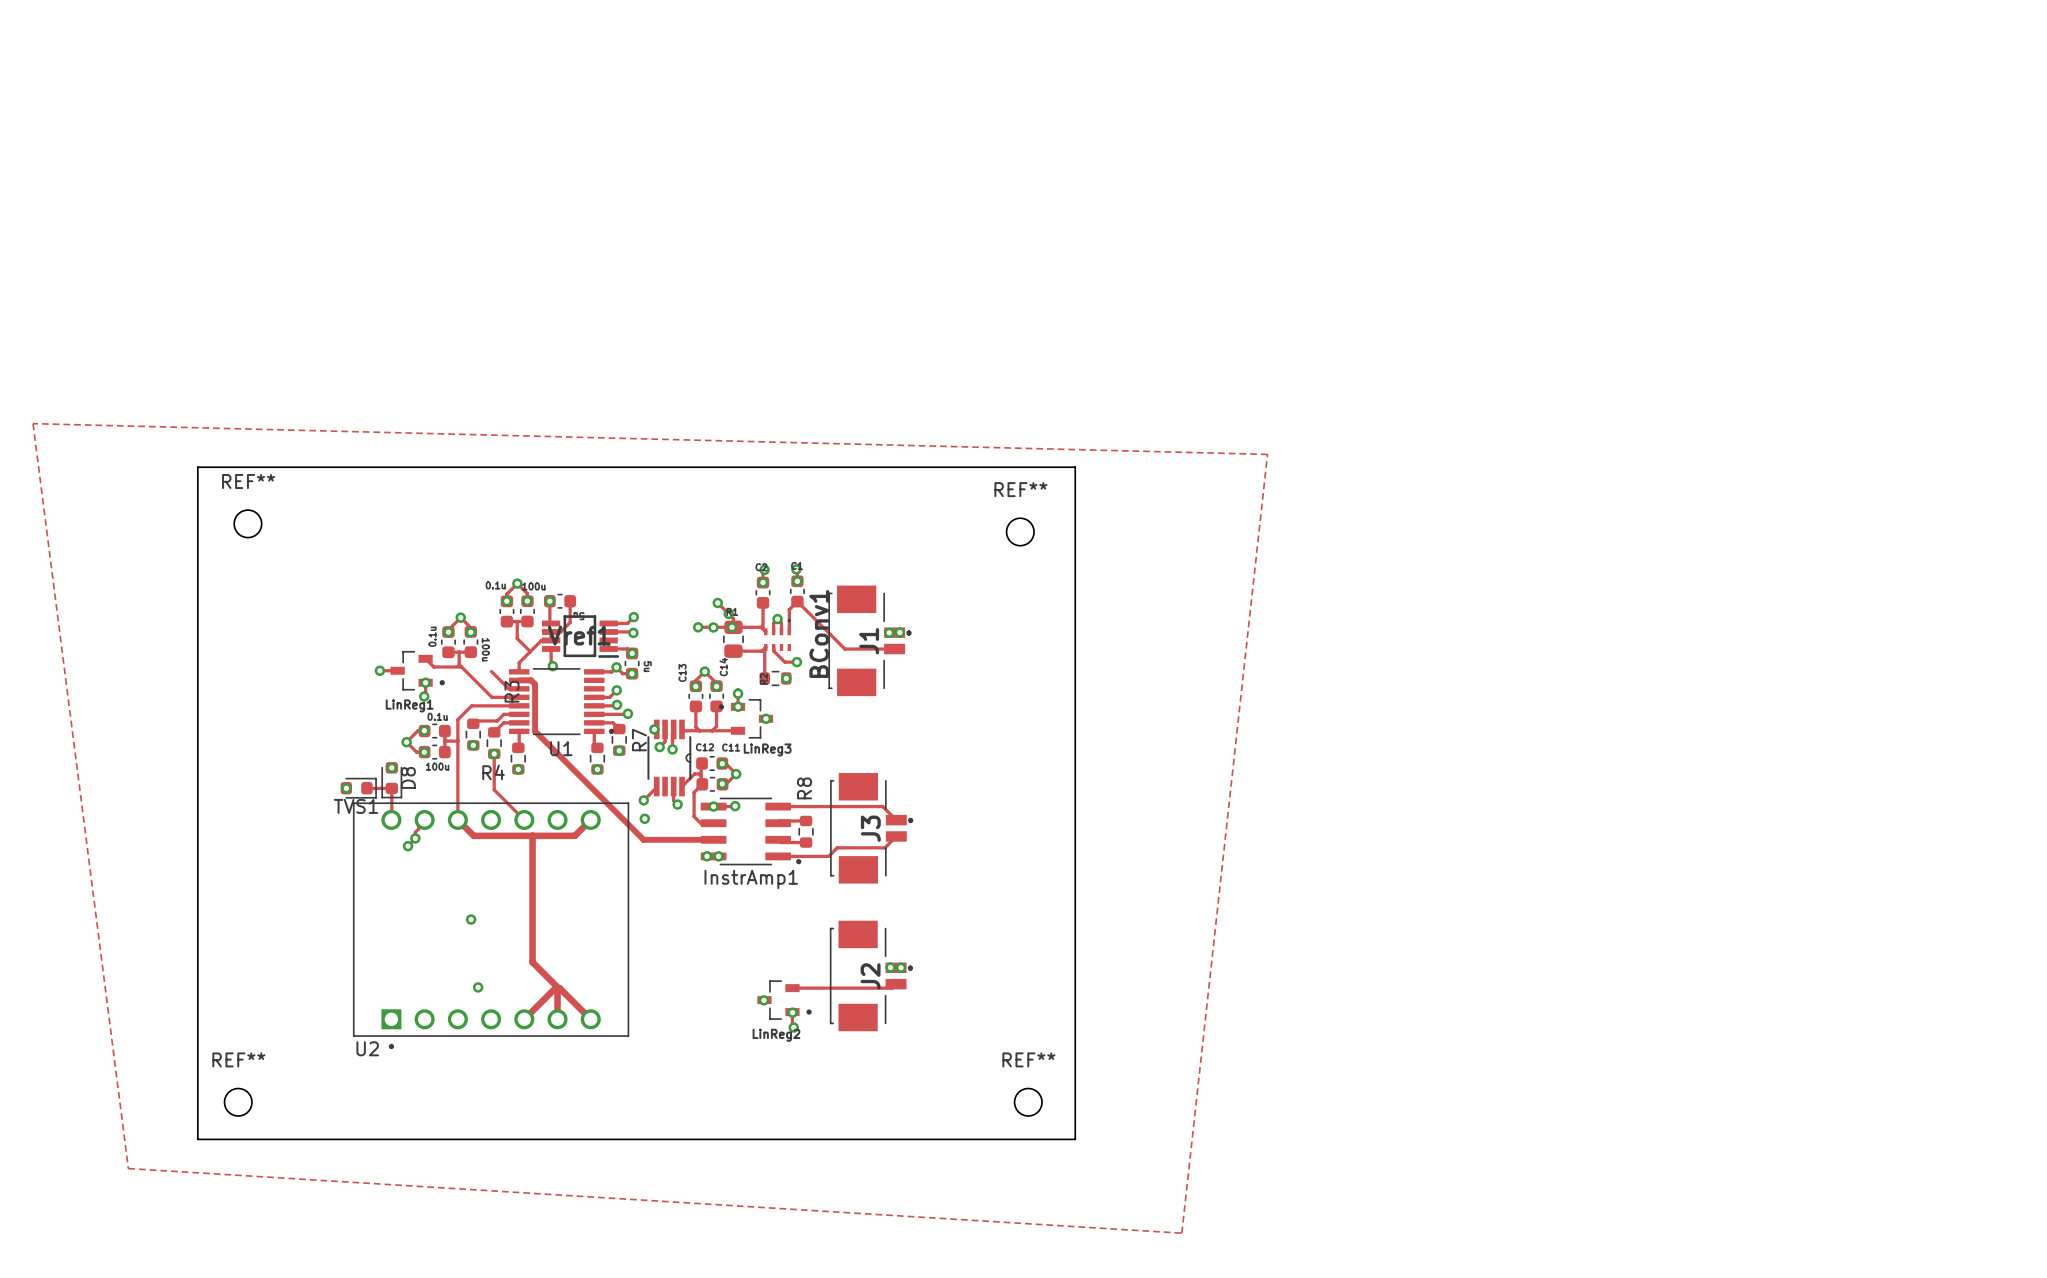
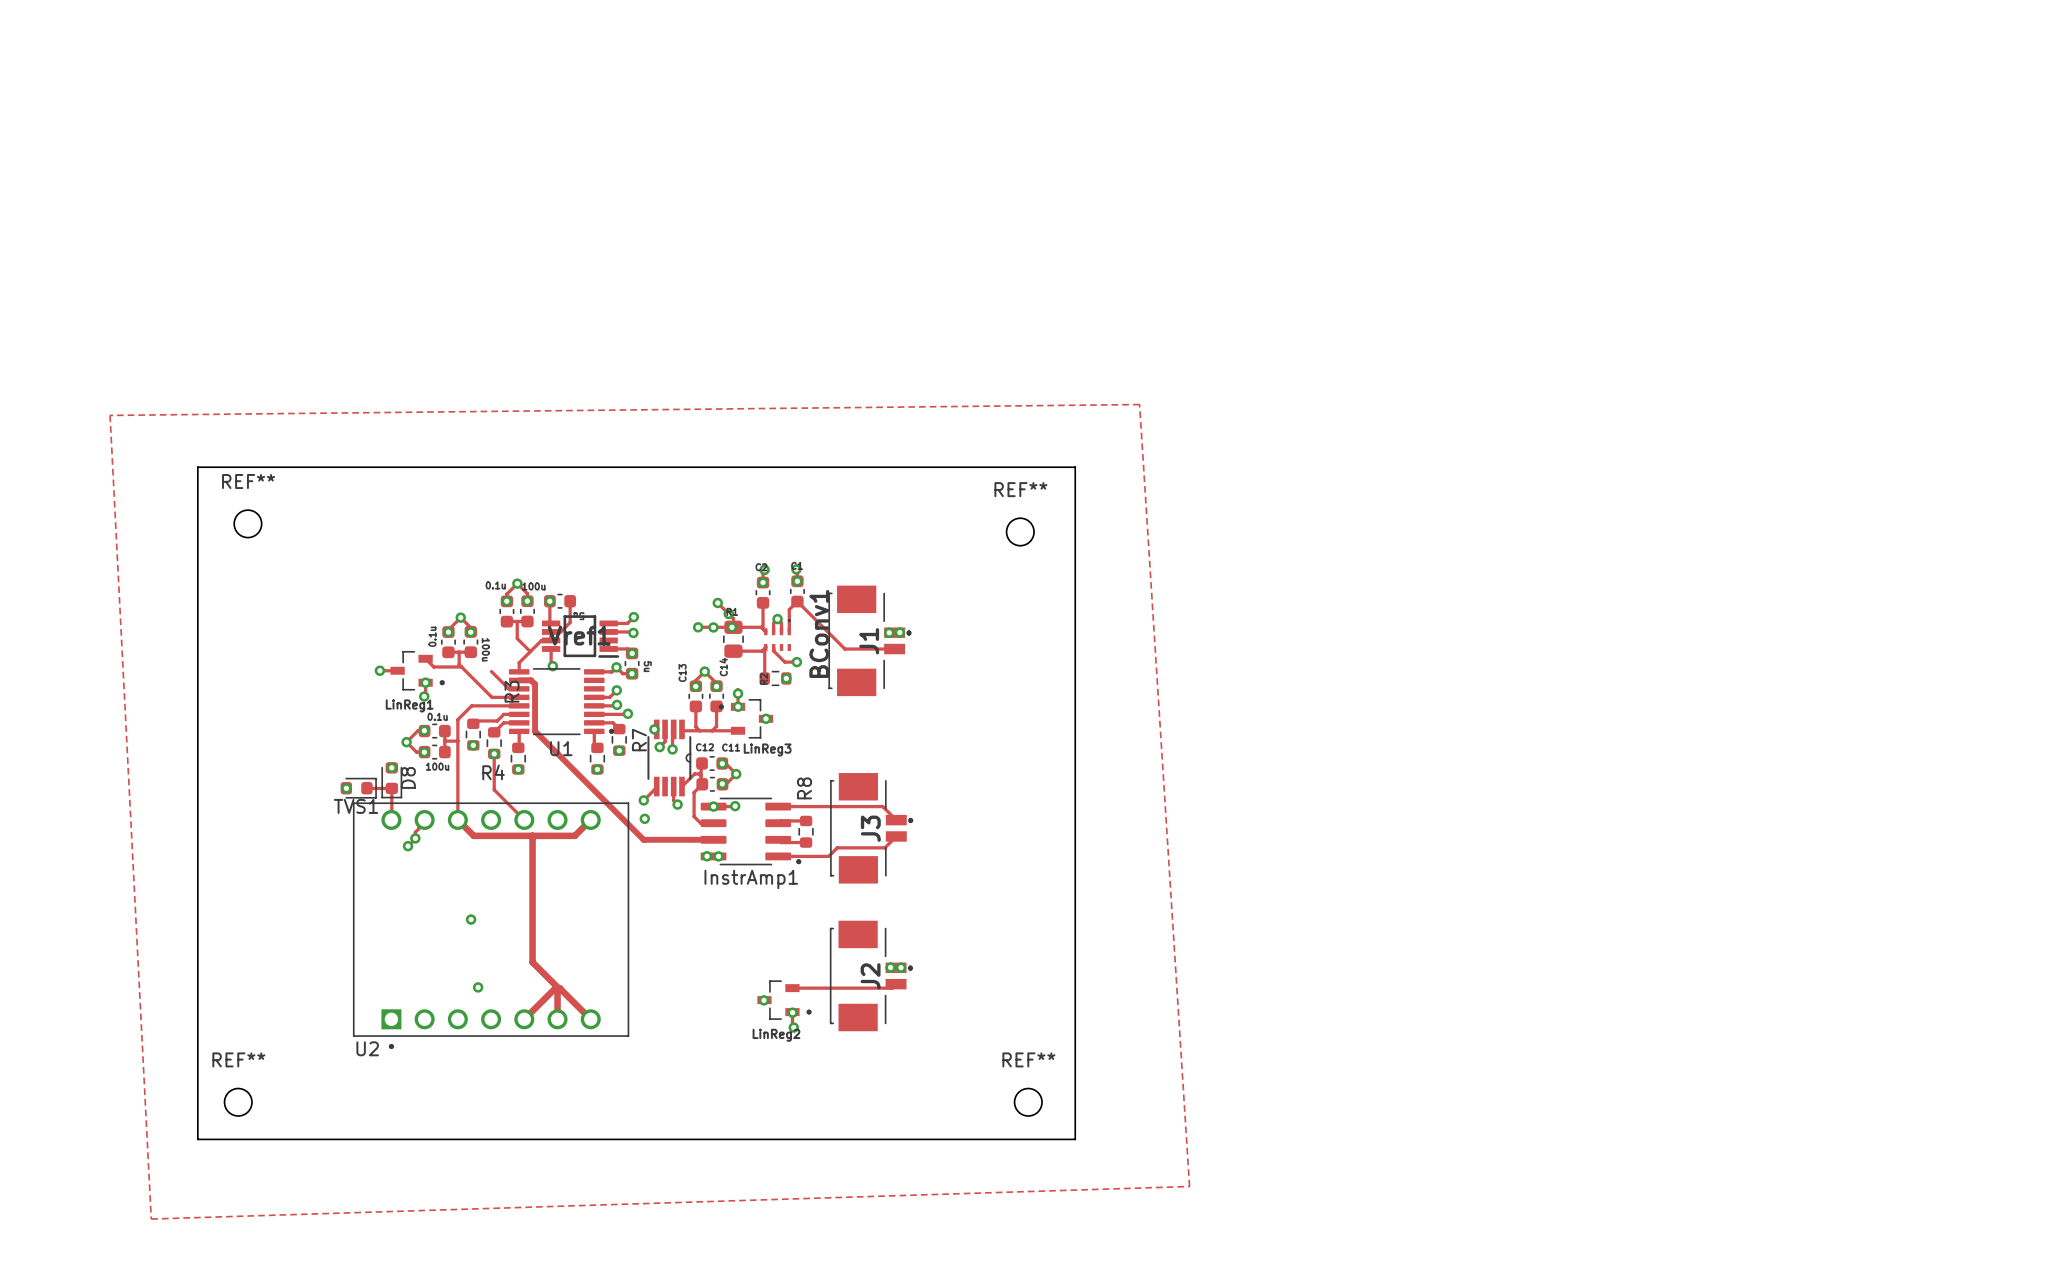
zone outline: (33, 423) (1267, 454) (1181, 1233) (128, 1168) (33, 423) -> (1139, 404) (110, 415) (151, 1219) (1189, 1186) (1139, 404)

